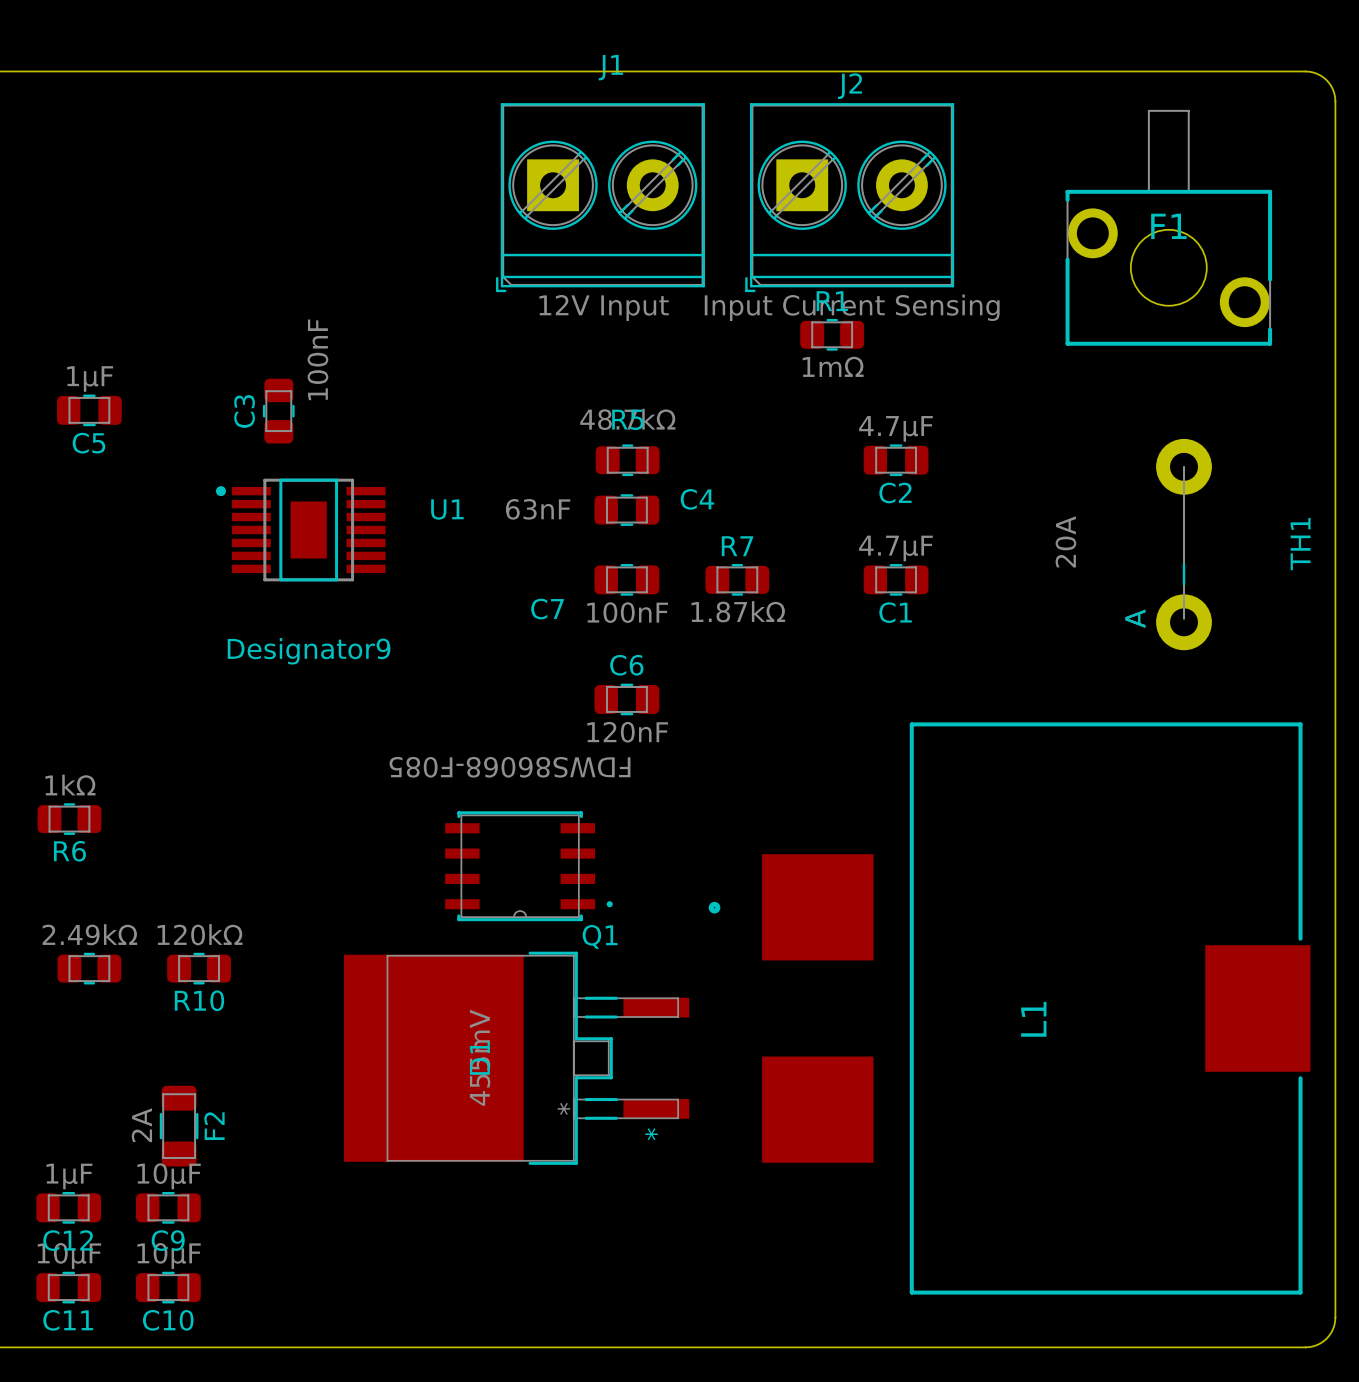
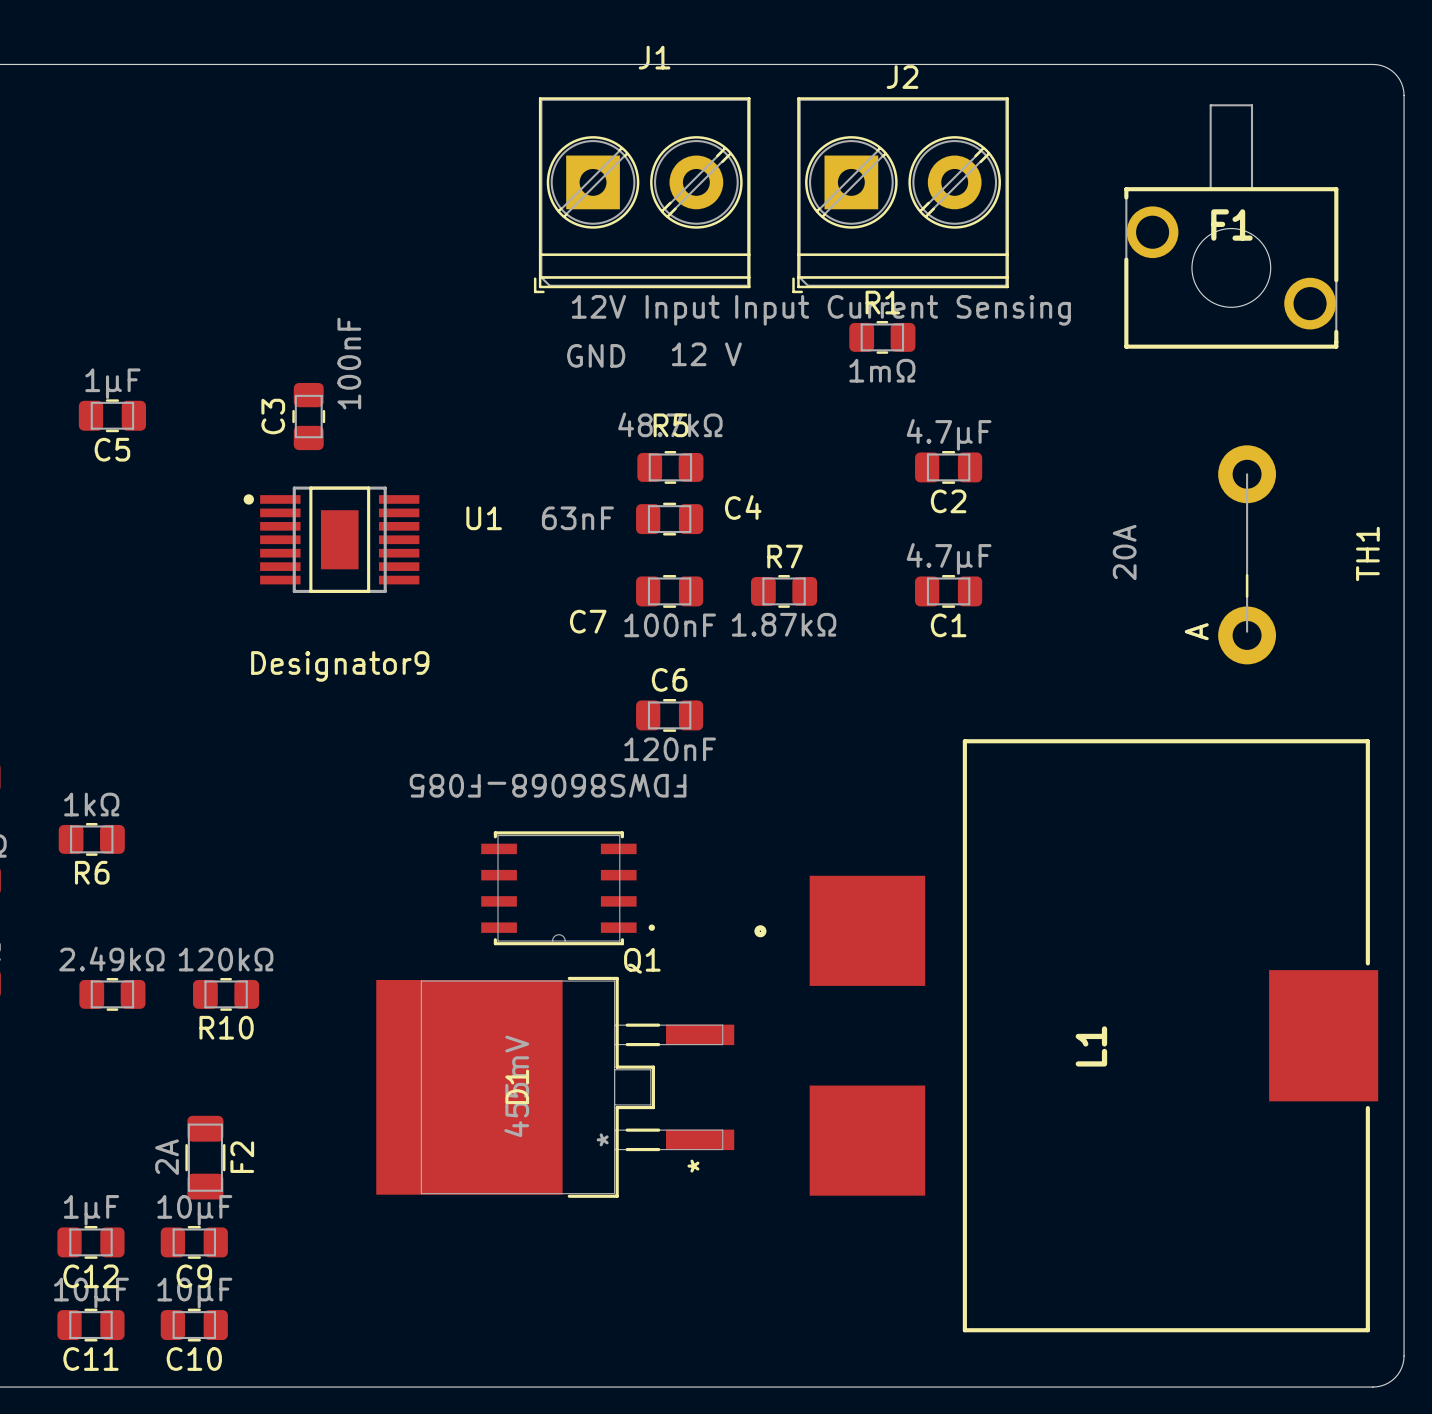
J1 text: none -> 12 V (706, 354)
J1 text: none -> GND (596, 355)

